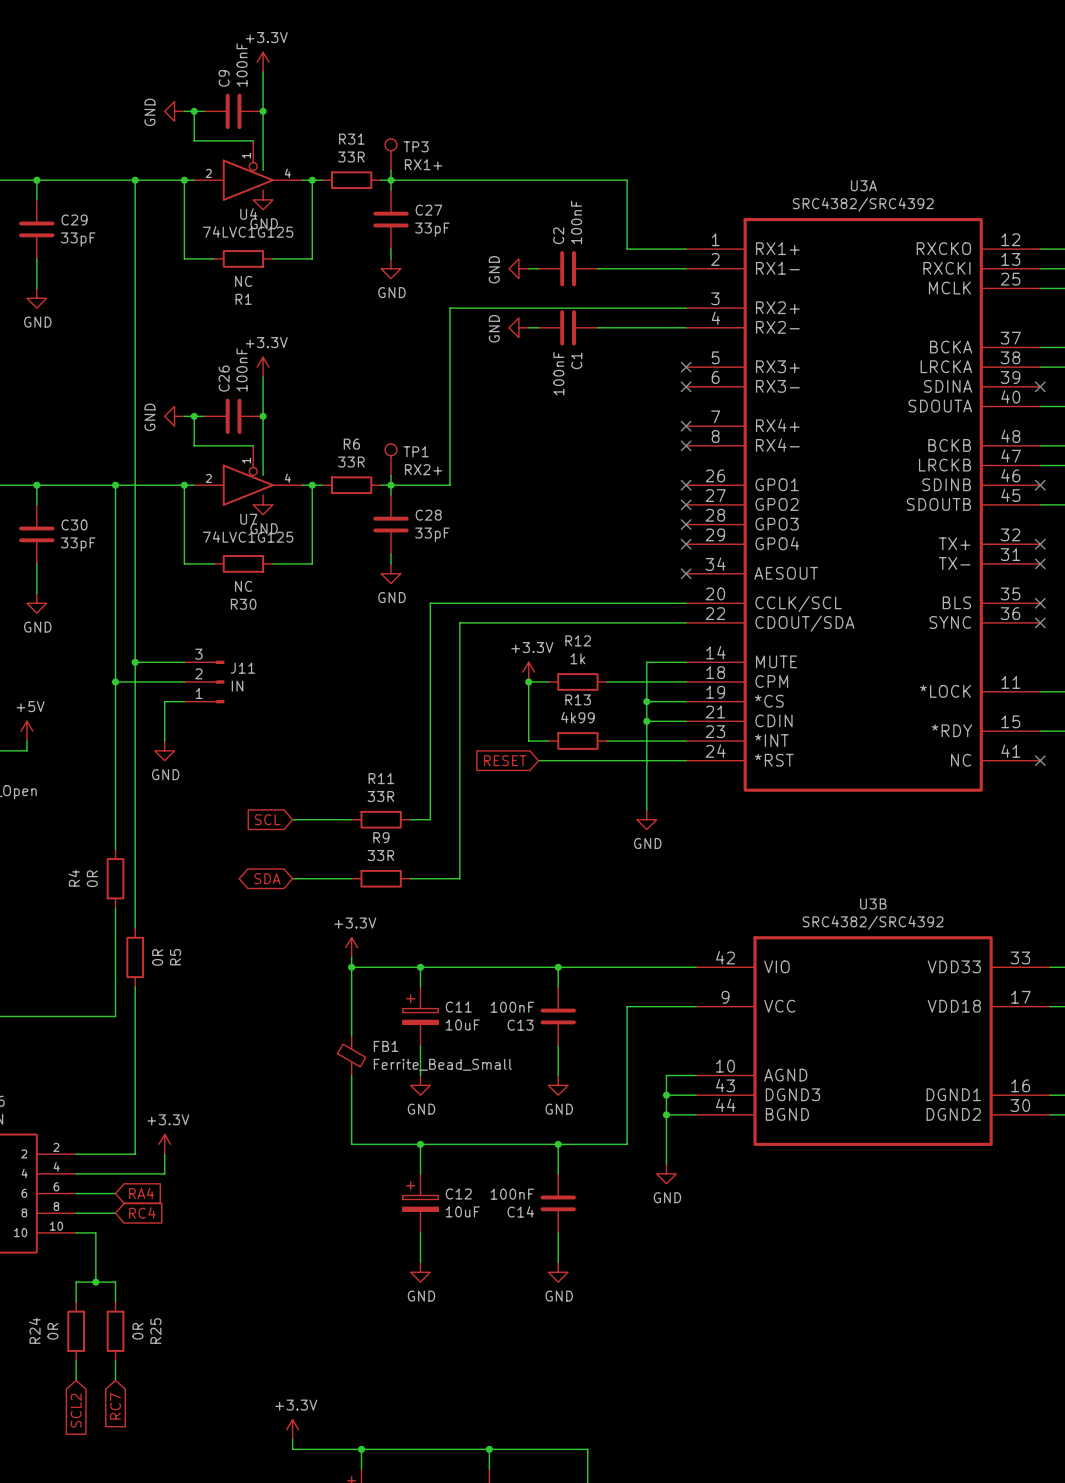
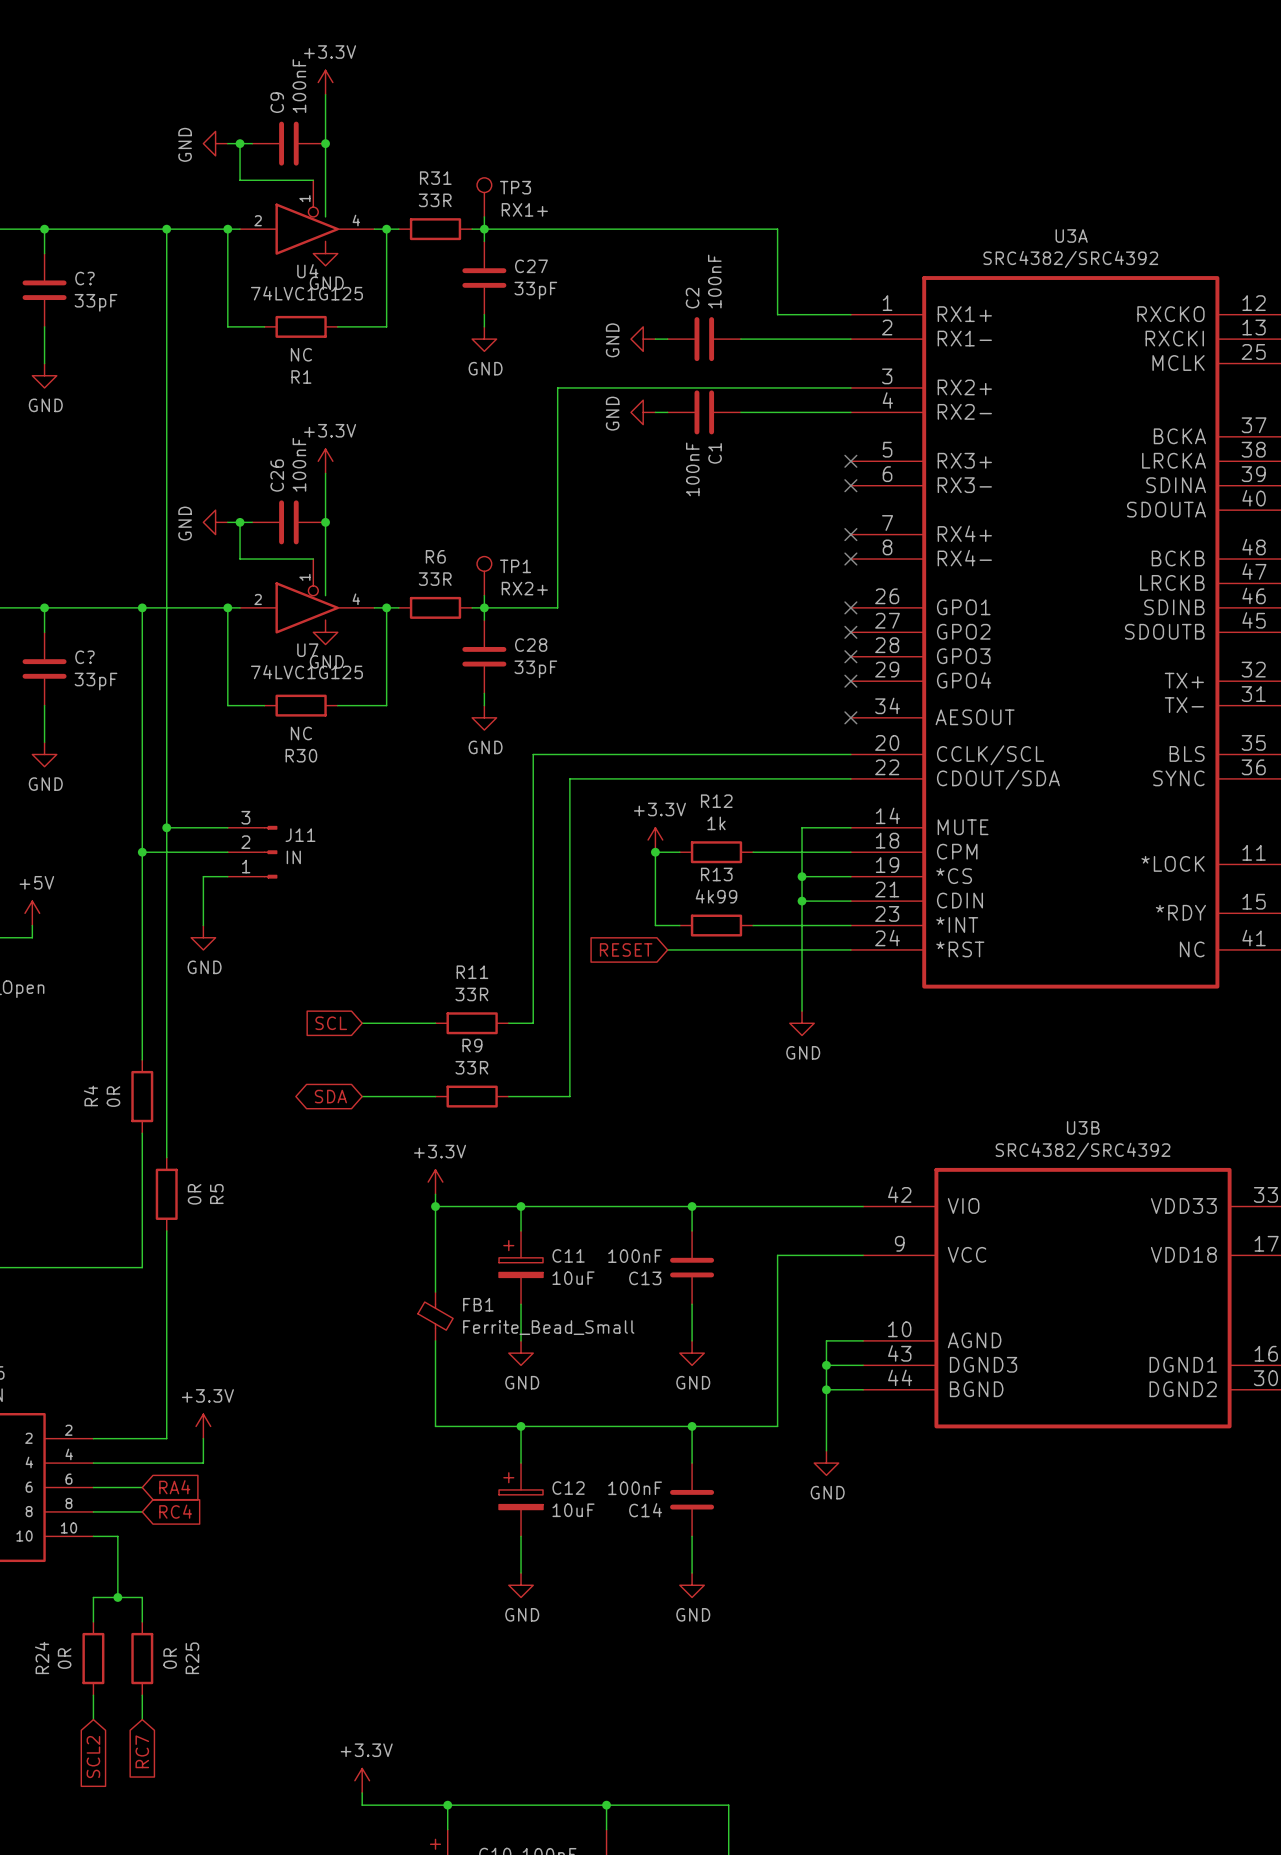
C29 name: C29 (74, 219) -> C? (84, 278)
C30 name: C30 (74, 524) -> C? (84, 657)

